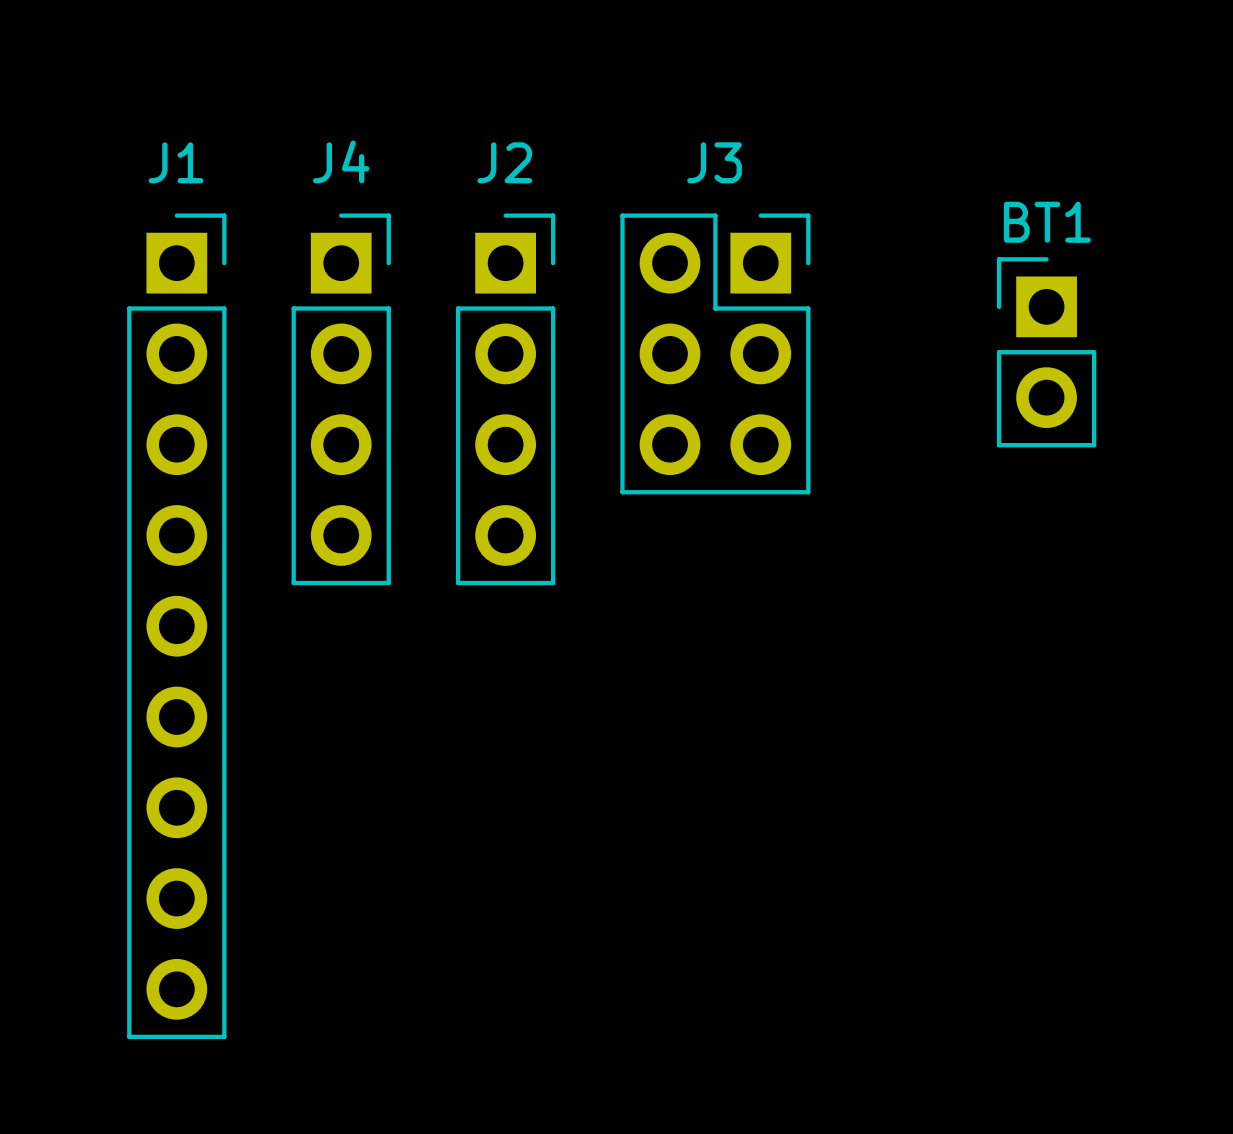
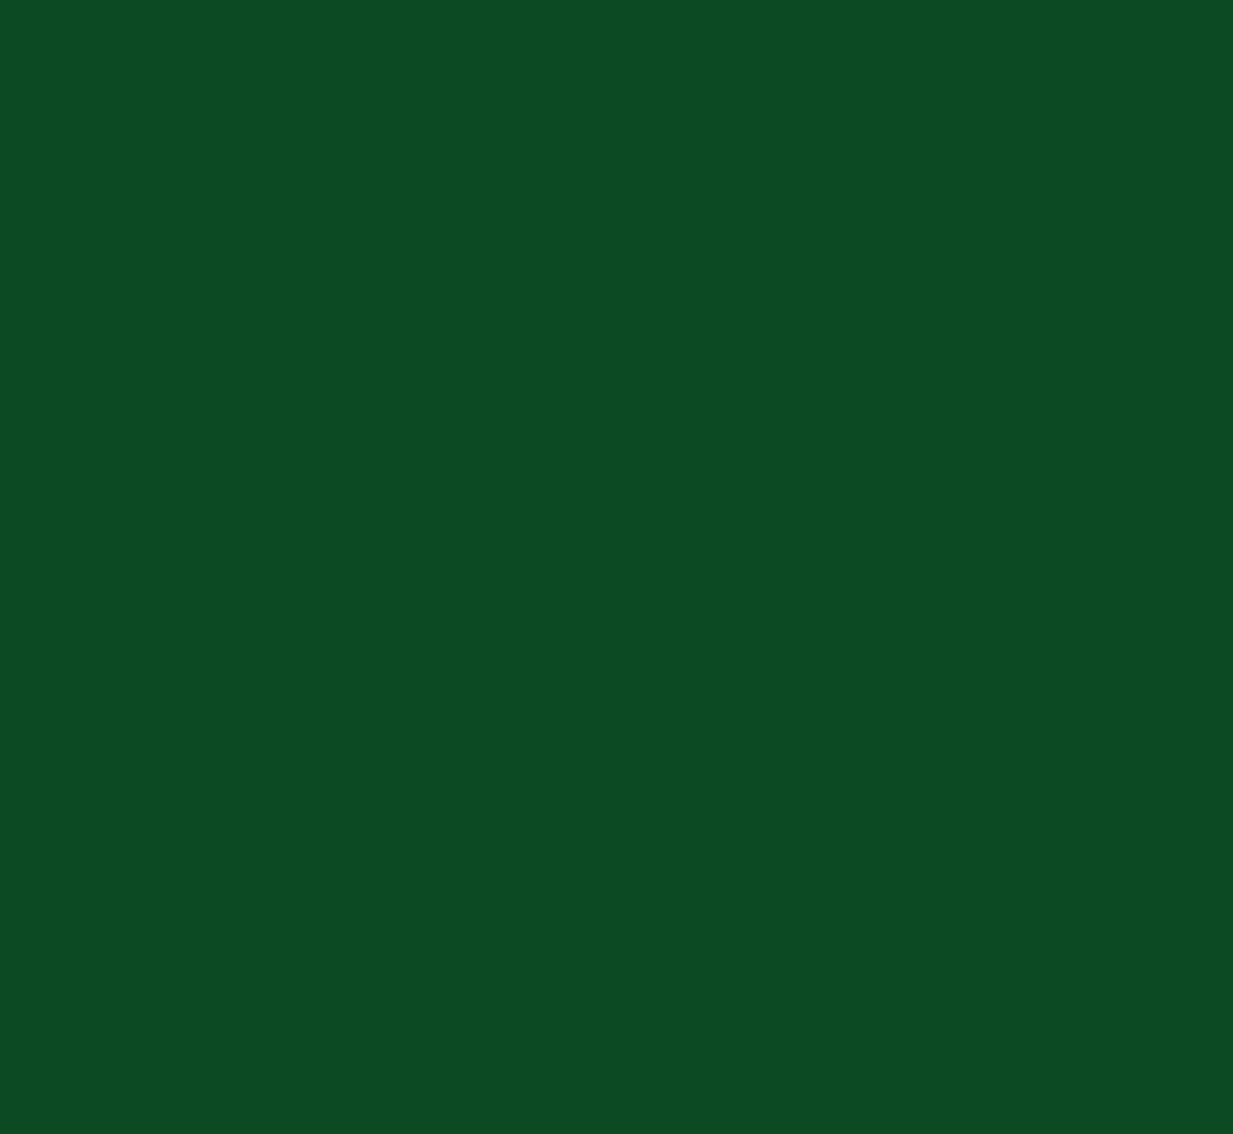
BT1: (1046, 352) -> none
J3: (715, 353) -> none
J4: (341, 399) -> none
J2: (505, 399) -> none
J1: (176, 626) -> none

